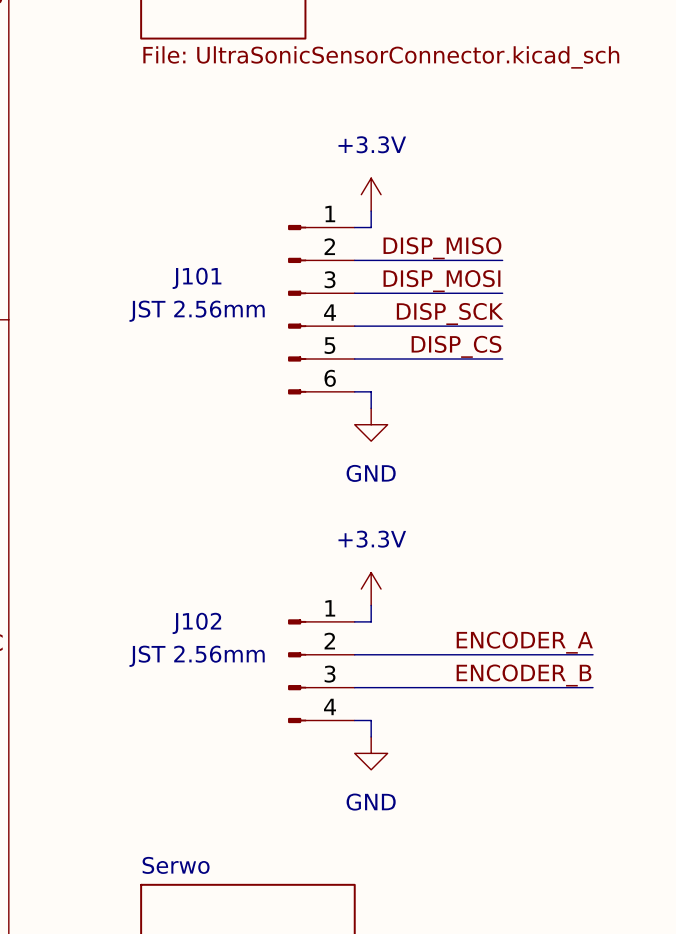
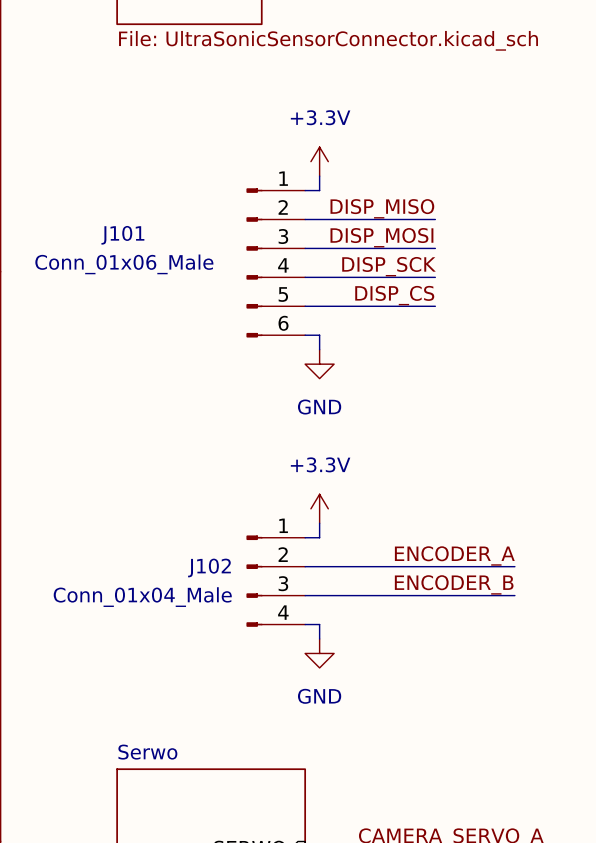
J101 name position: J101 (197, 278) -> J101 (122, 235)
J101 value: JST 2.56mm (197, 311) -> Conn_01x06_Male (124, 264)
J102 name position: J102 (196, 623) -> J102 (209, 567)
J102 value: JST 2.56mm (197, 656) -> Conn_01x04_Male (142, 597)

